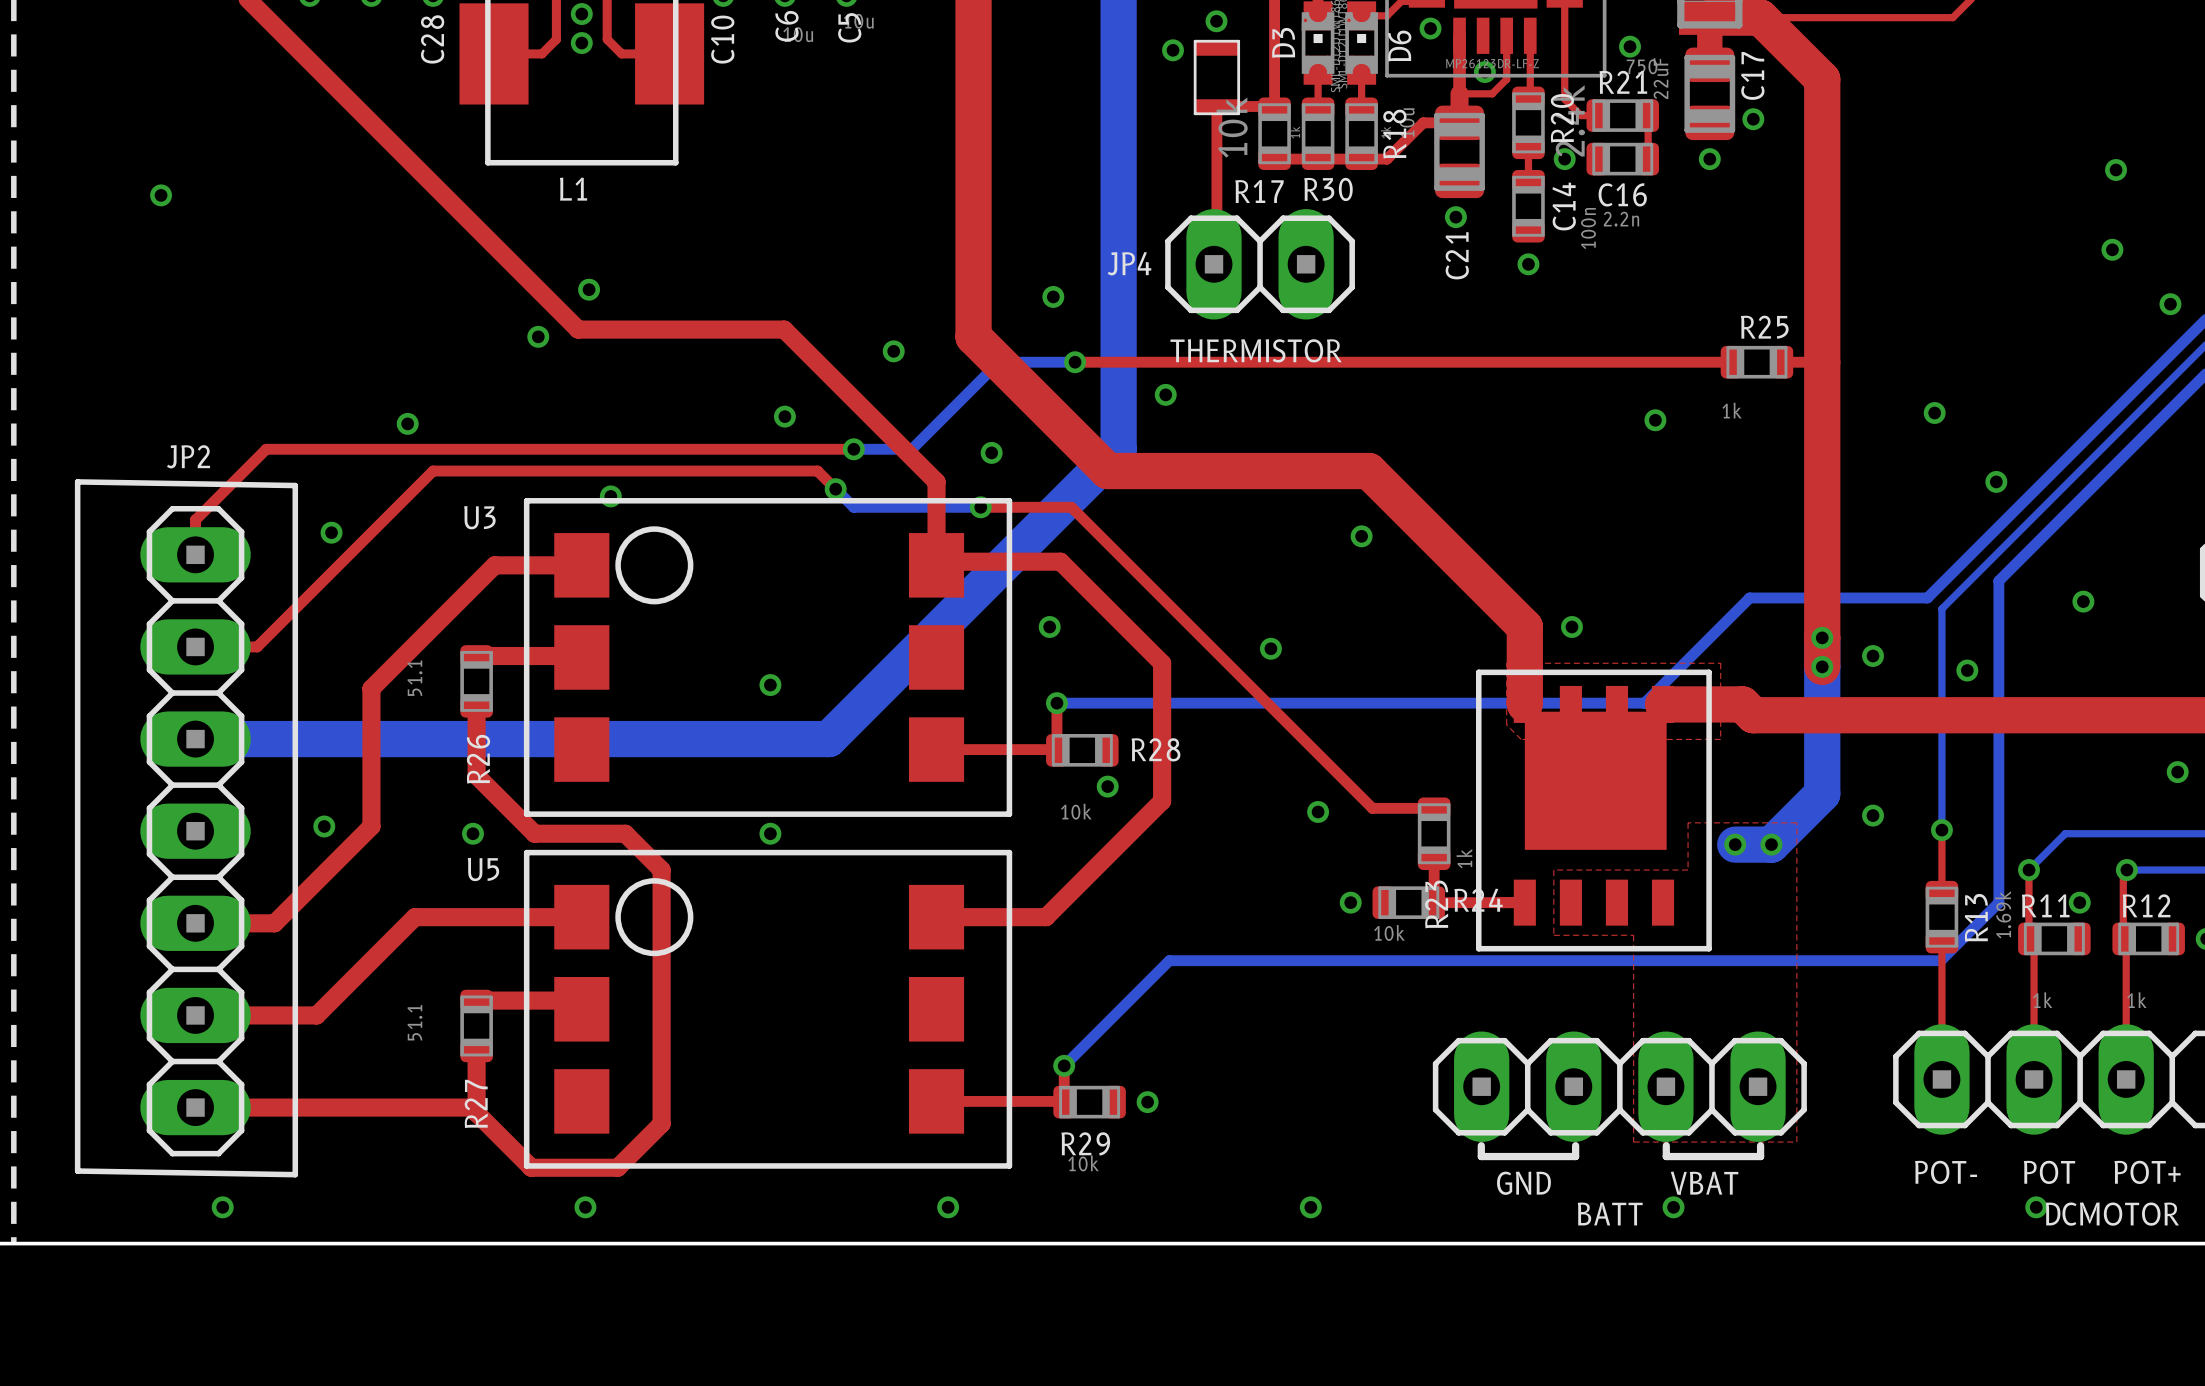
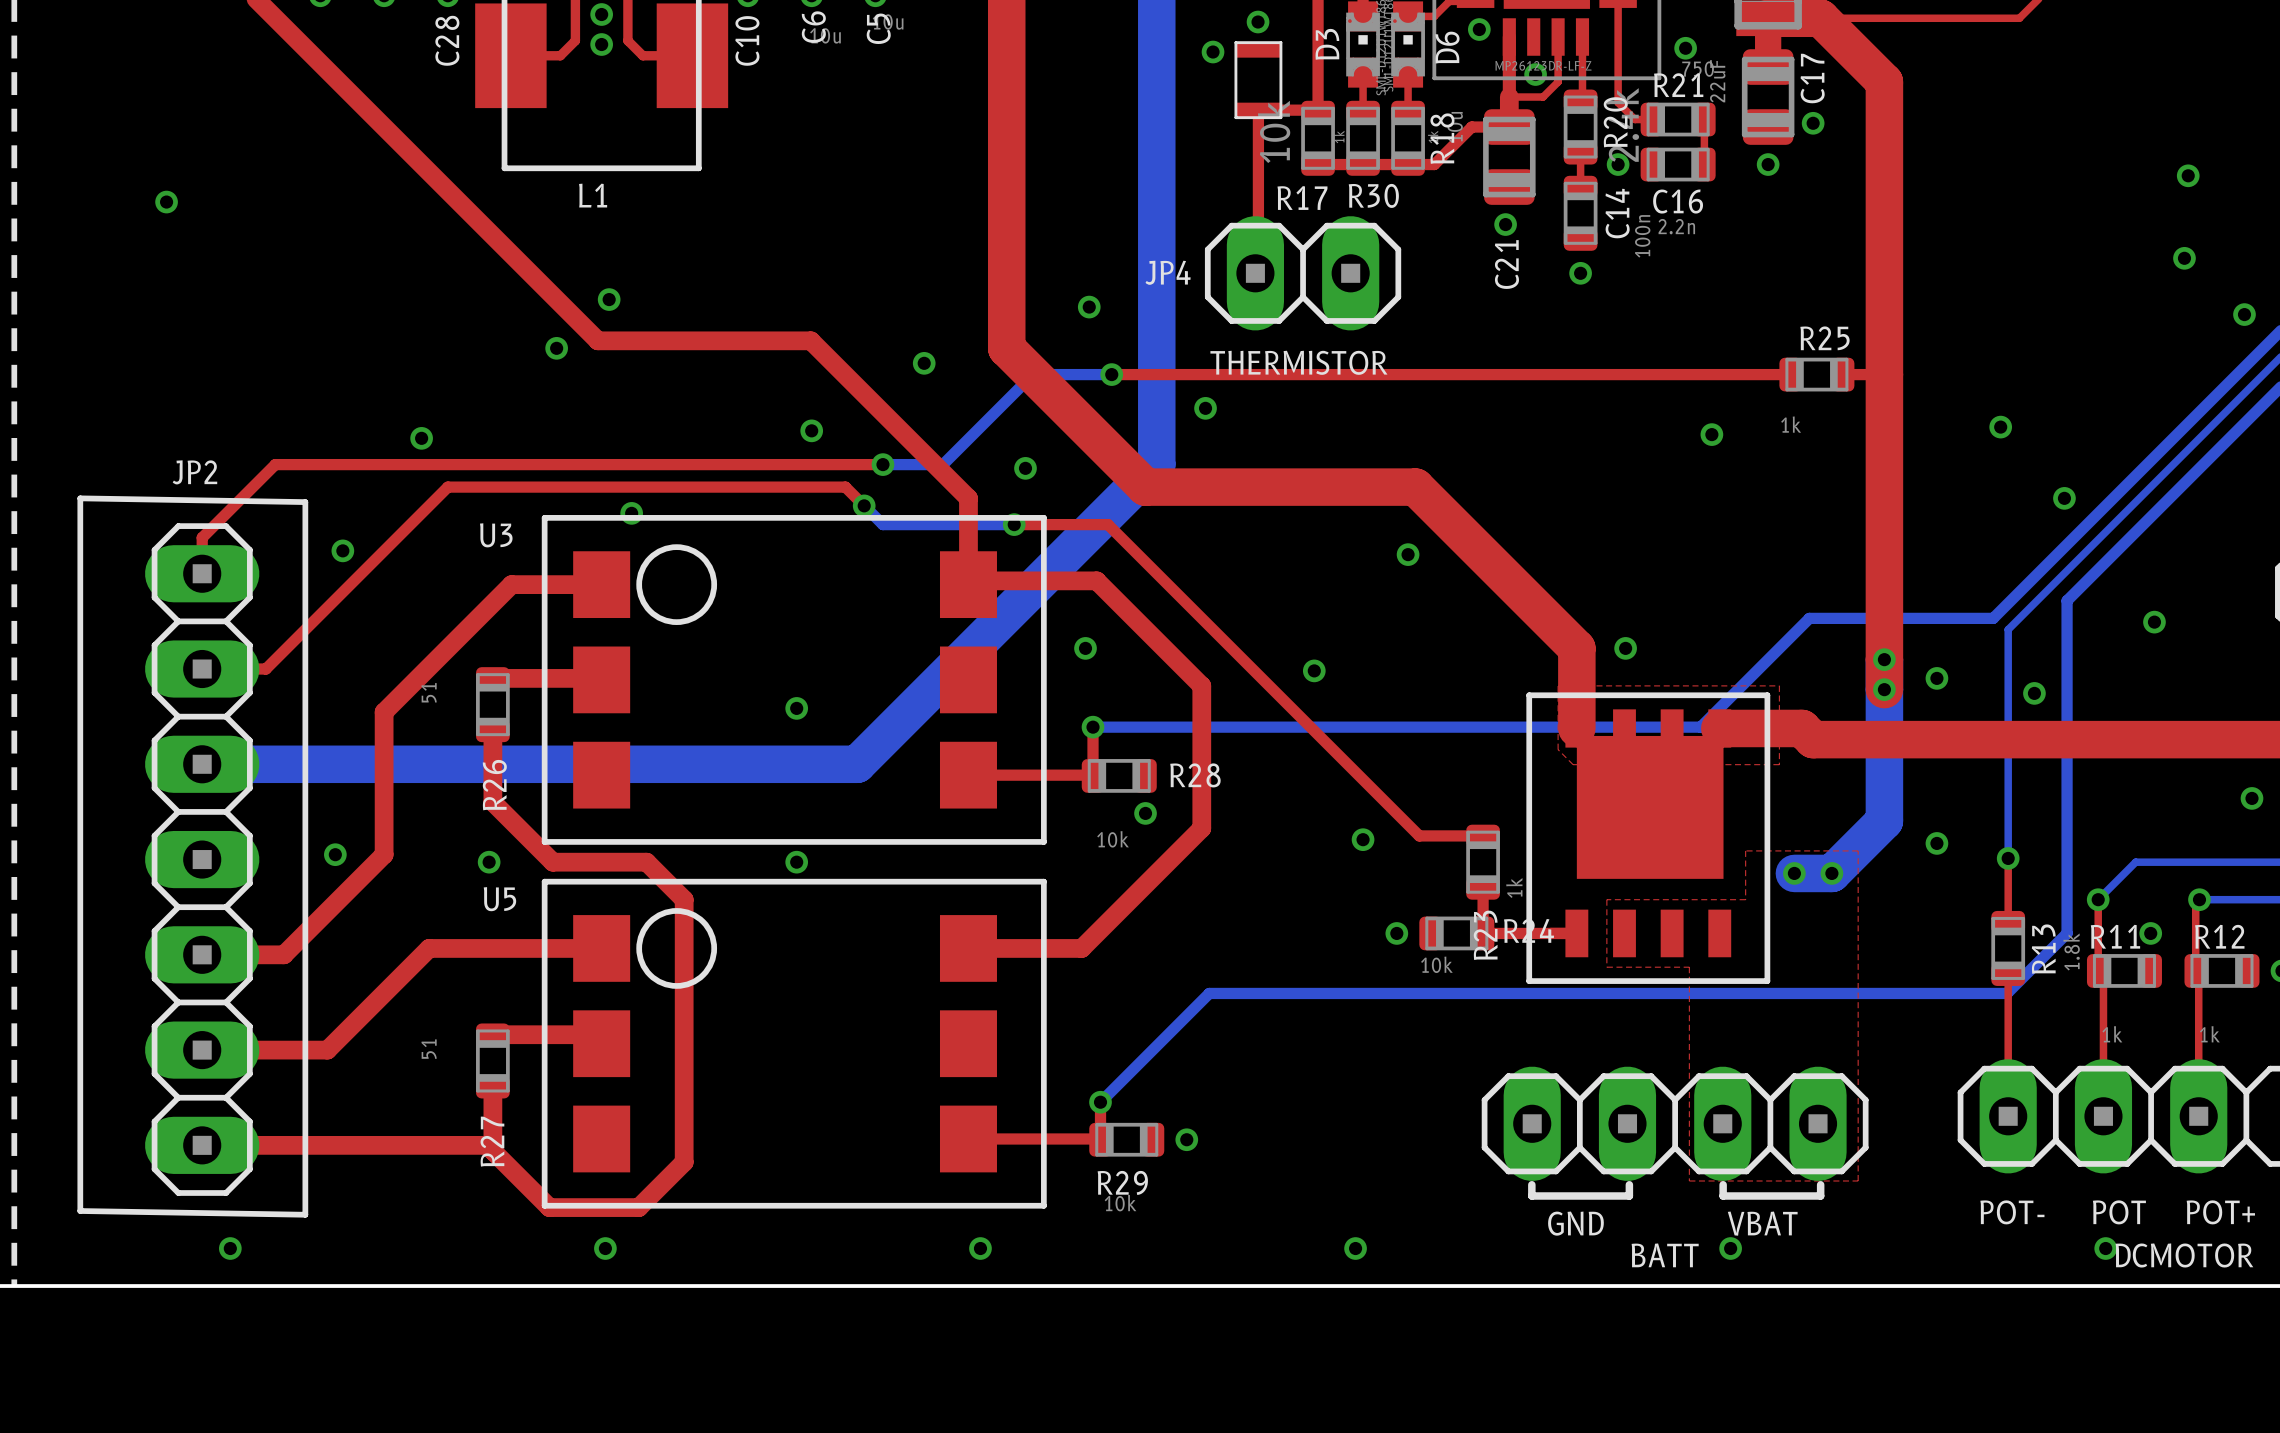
R26 value: 51.1 (414, 678) -> 51 (429, 692)
R13 value: 1.69k (2003, 914) -> 1.8k (2071, 951)
R27 value: 51.1 (414, 1022) -> 51 (429, 1049)

